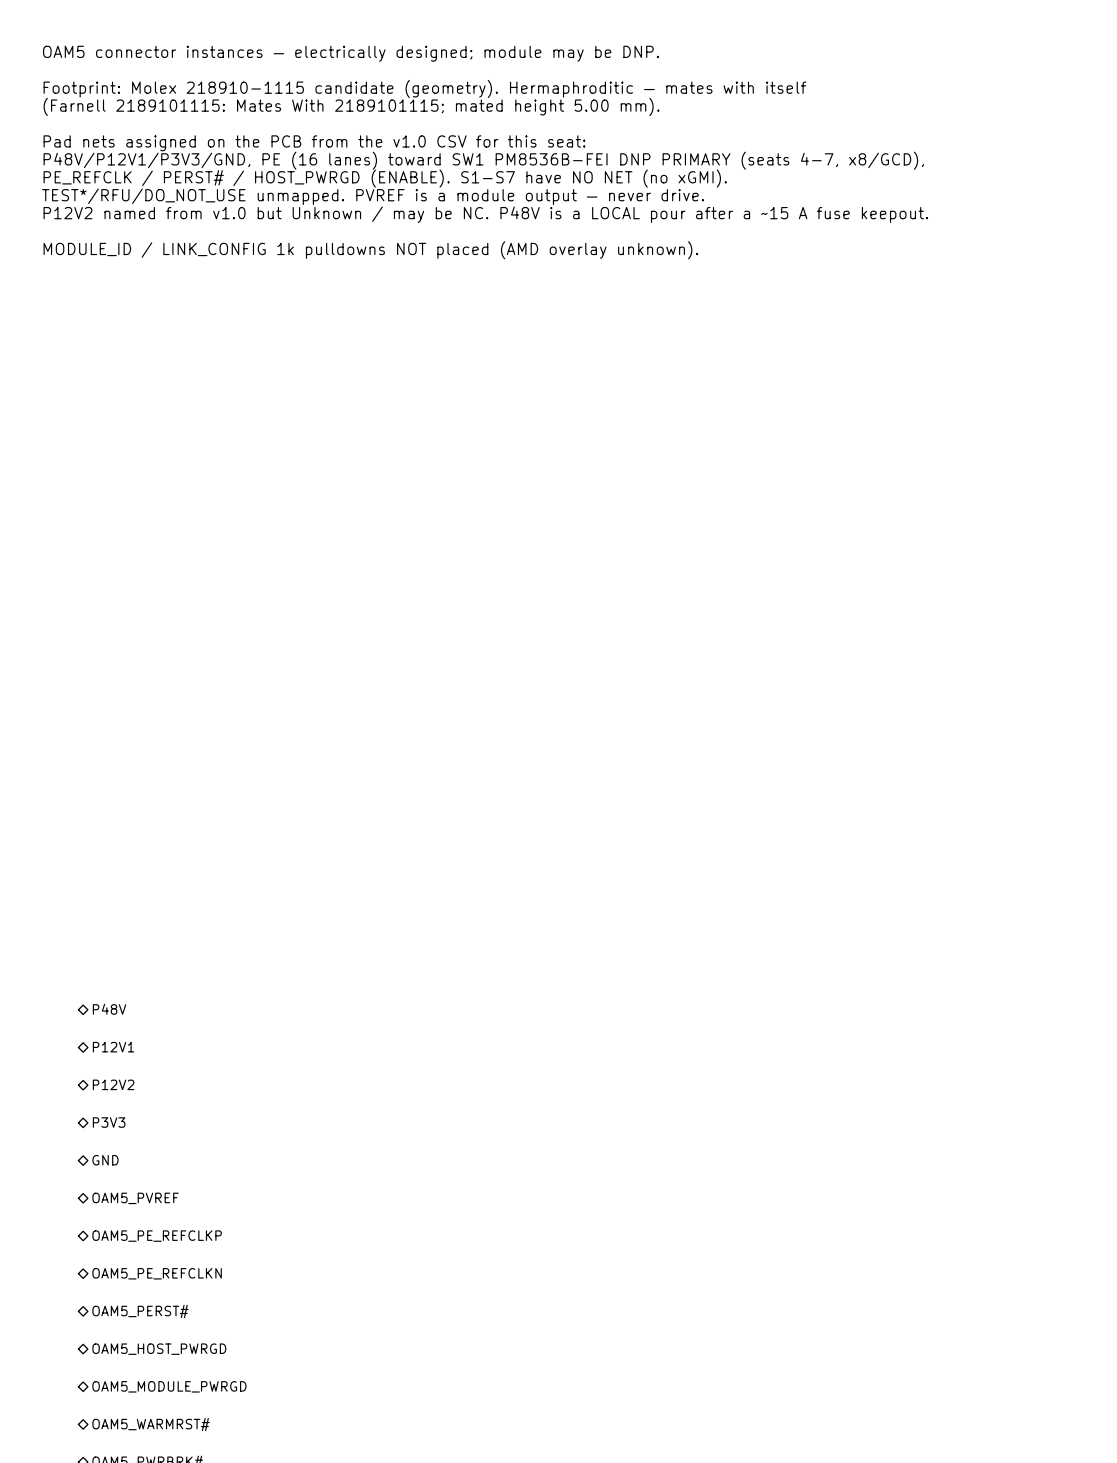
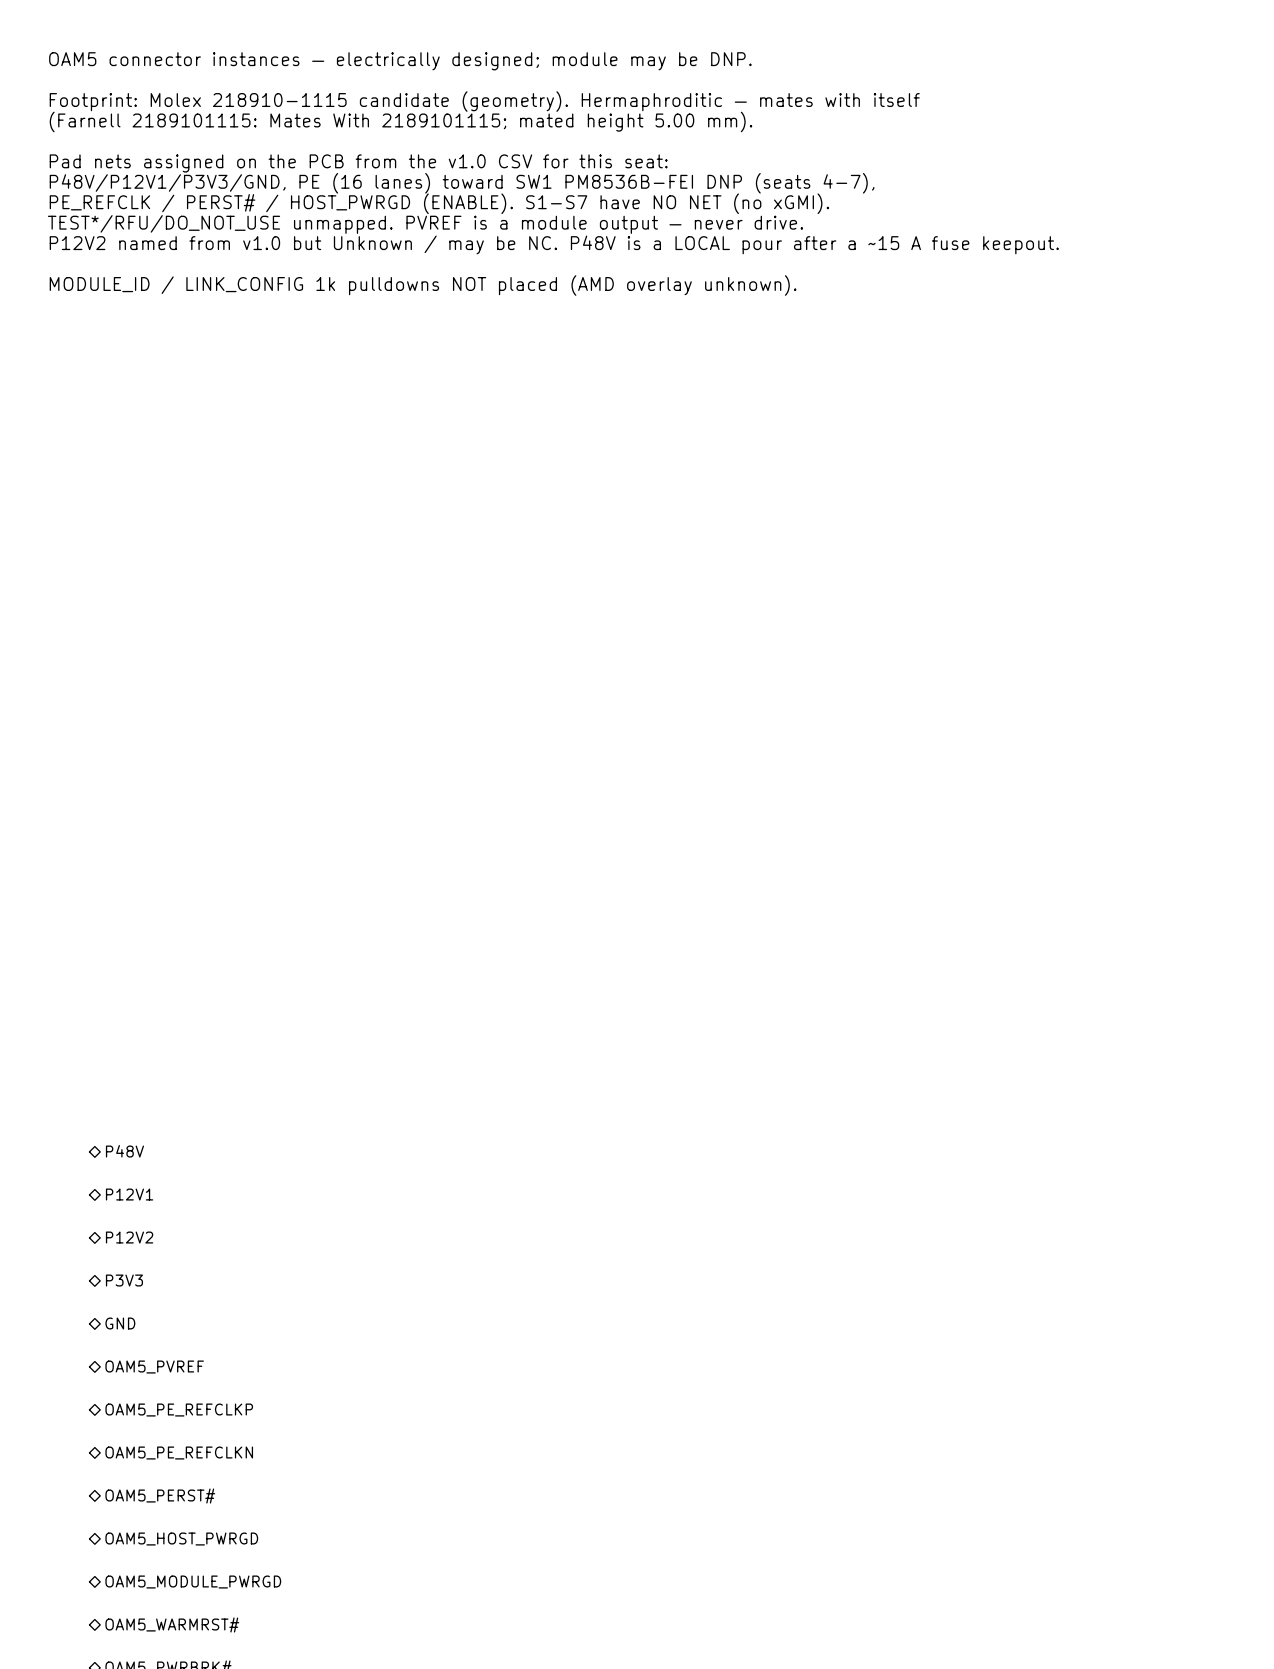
text: P48V/P12V1/P3V3/GND, PE (16 lanes) toward SW1 PM8536B-FEI DNP PRIMARY (seats 4-7, x8/GCD), (483, 160) -> P48V/P12V1/P3V3/GND, PE (16 lanes) toward SW1 PM8536B-FEI DNP (seats 4-7), (462, 183)

